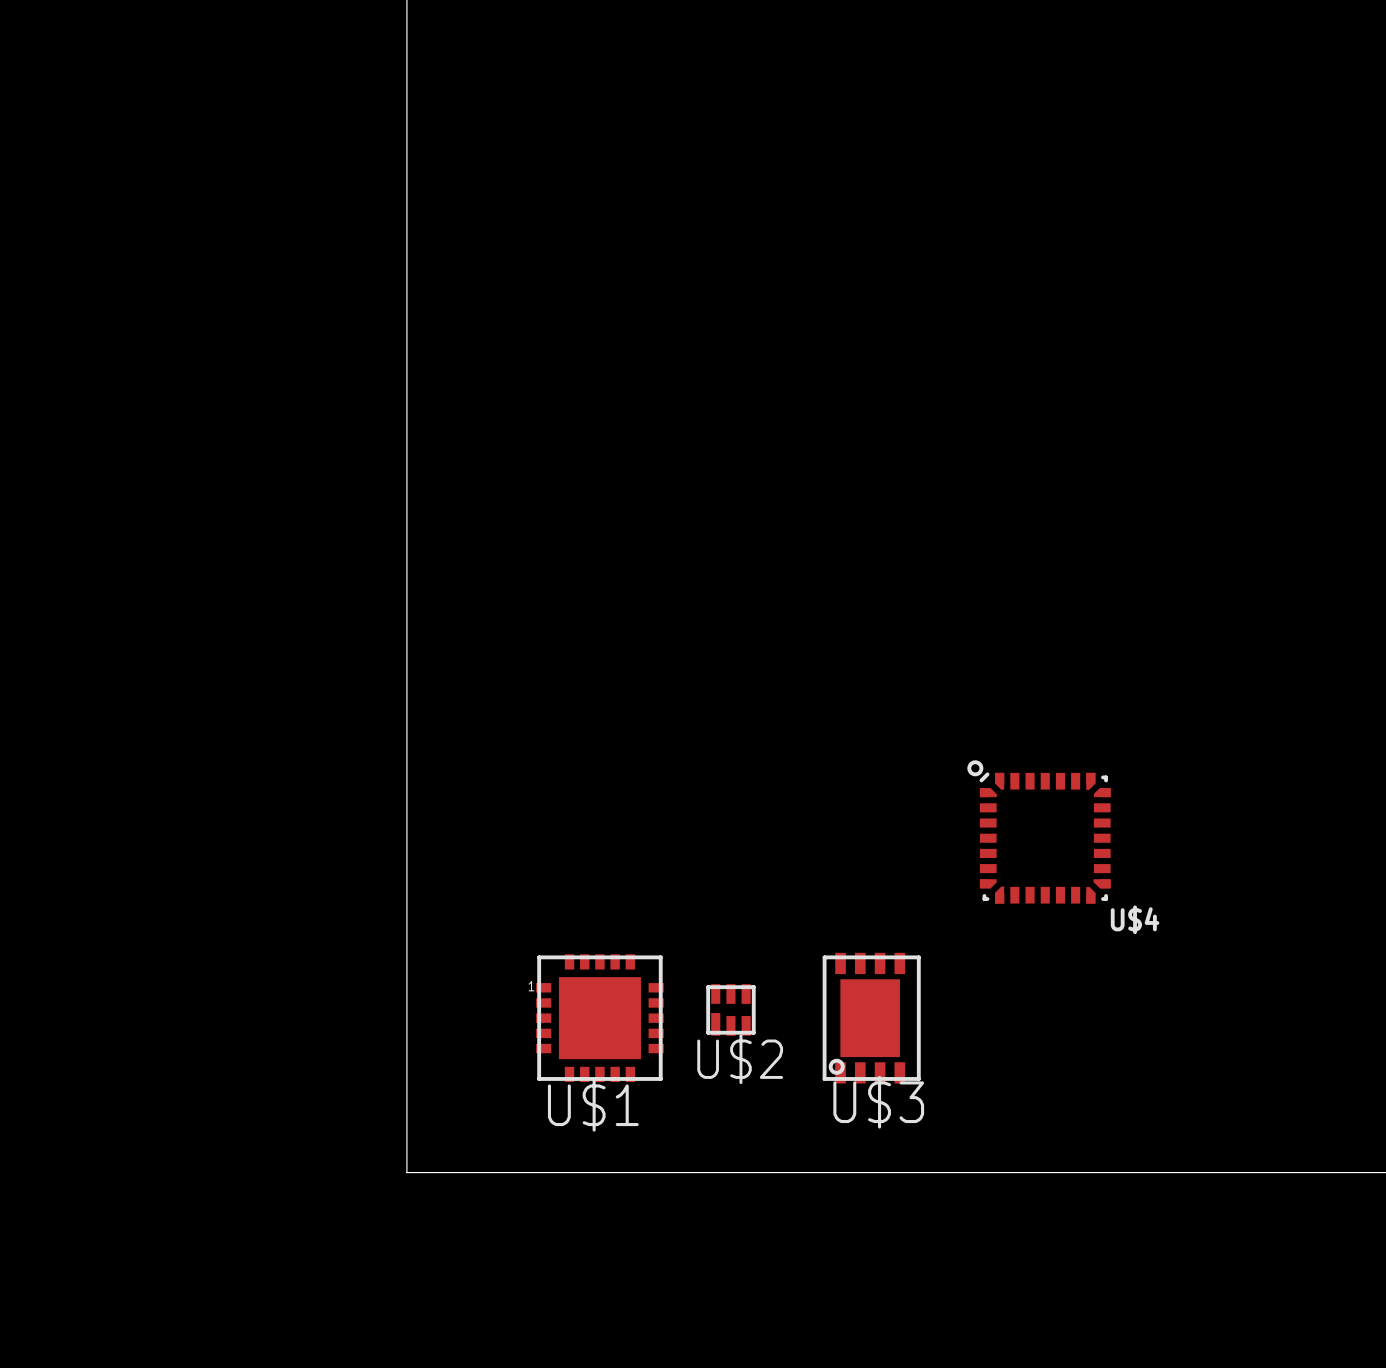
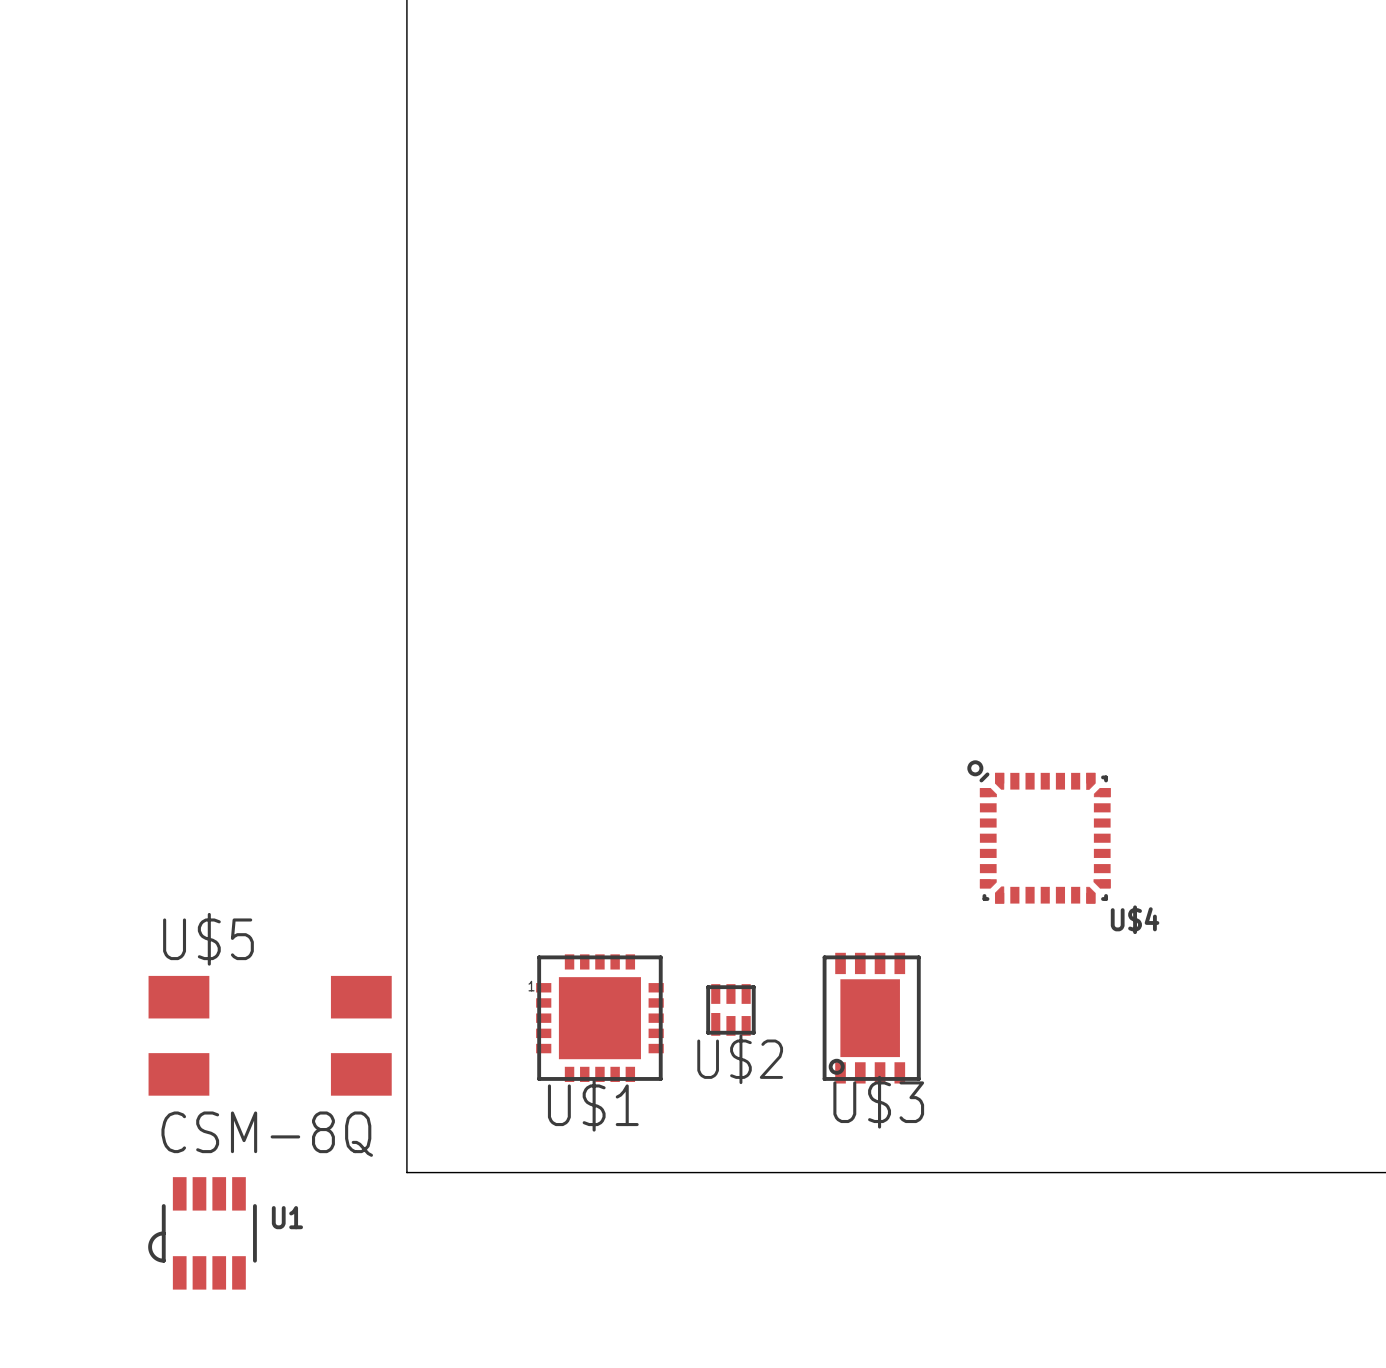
U$5: none -> CSM-8Q (270, 1035)
U1: none -> (202, 1233)

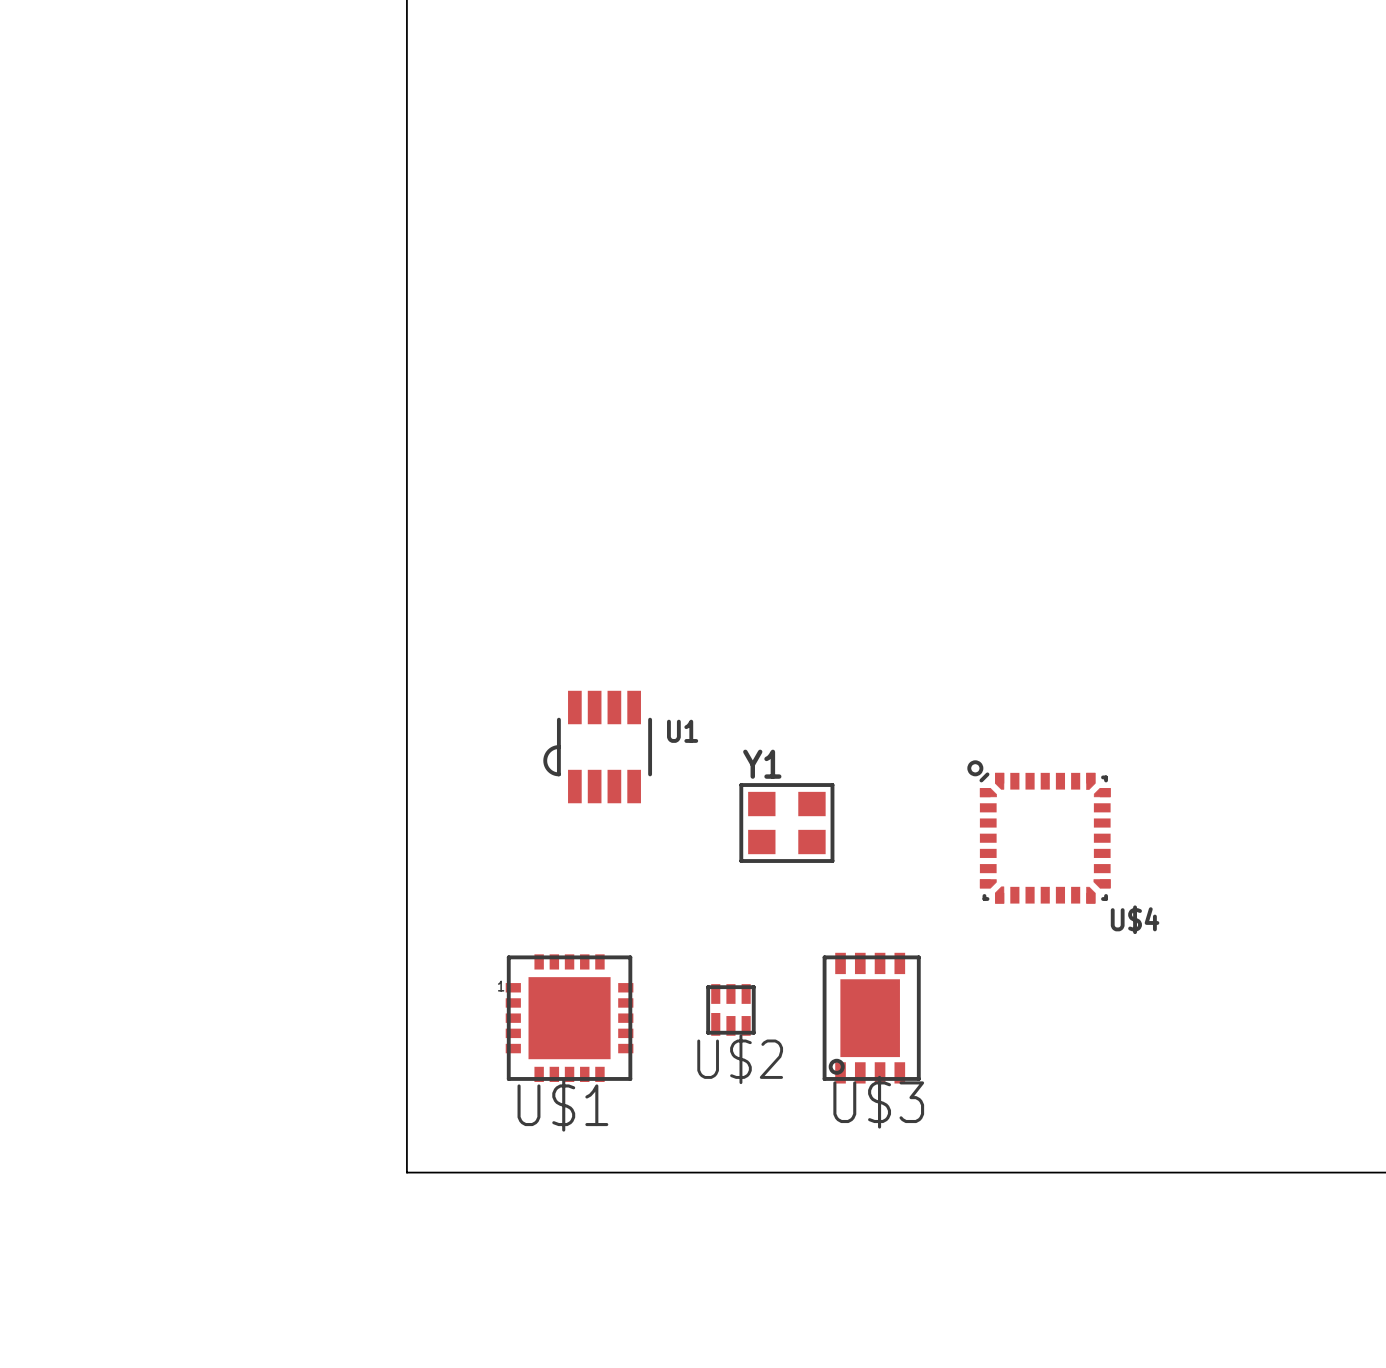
Y1: none -> (786, 823)
U$1 position: (599, 1018) -> (569, 1018)
U$5: CSM-8Q (270, 1035) -> none
U1 position: (202, 1233) -> (597, 747)

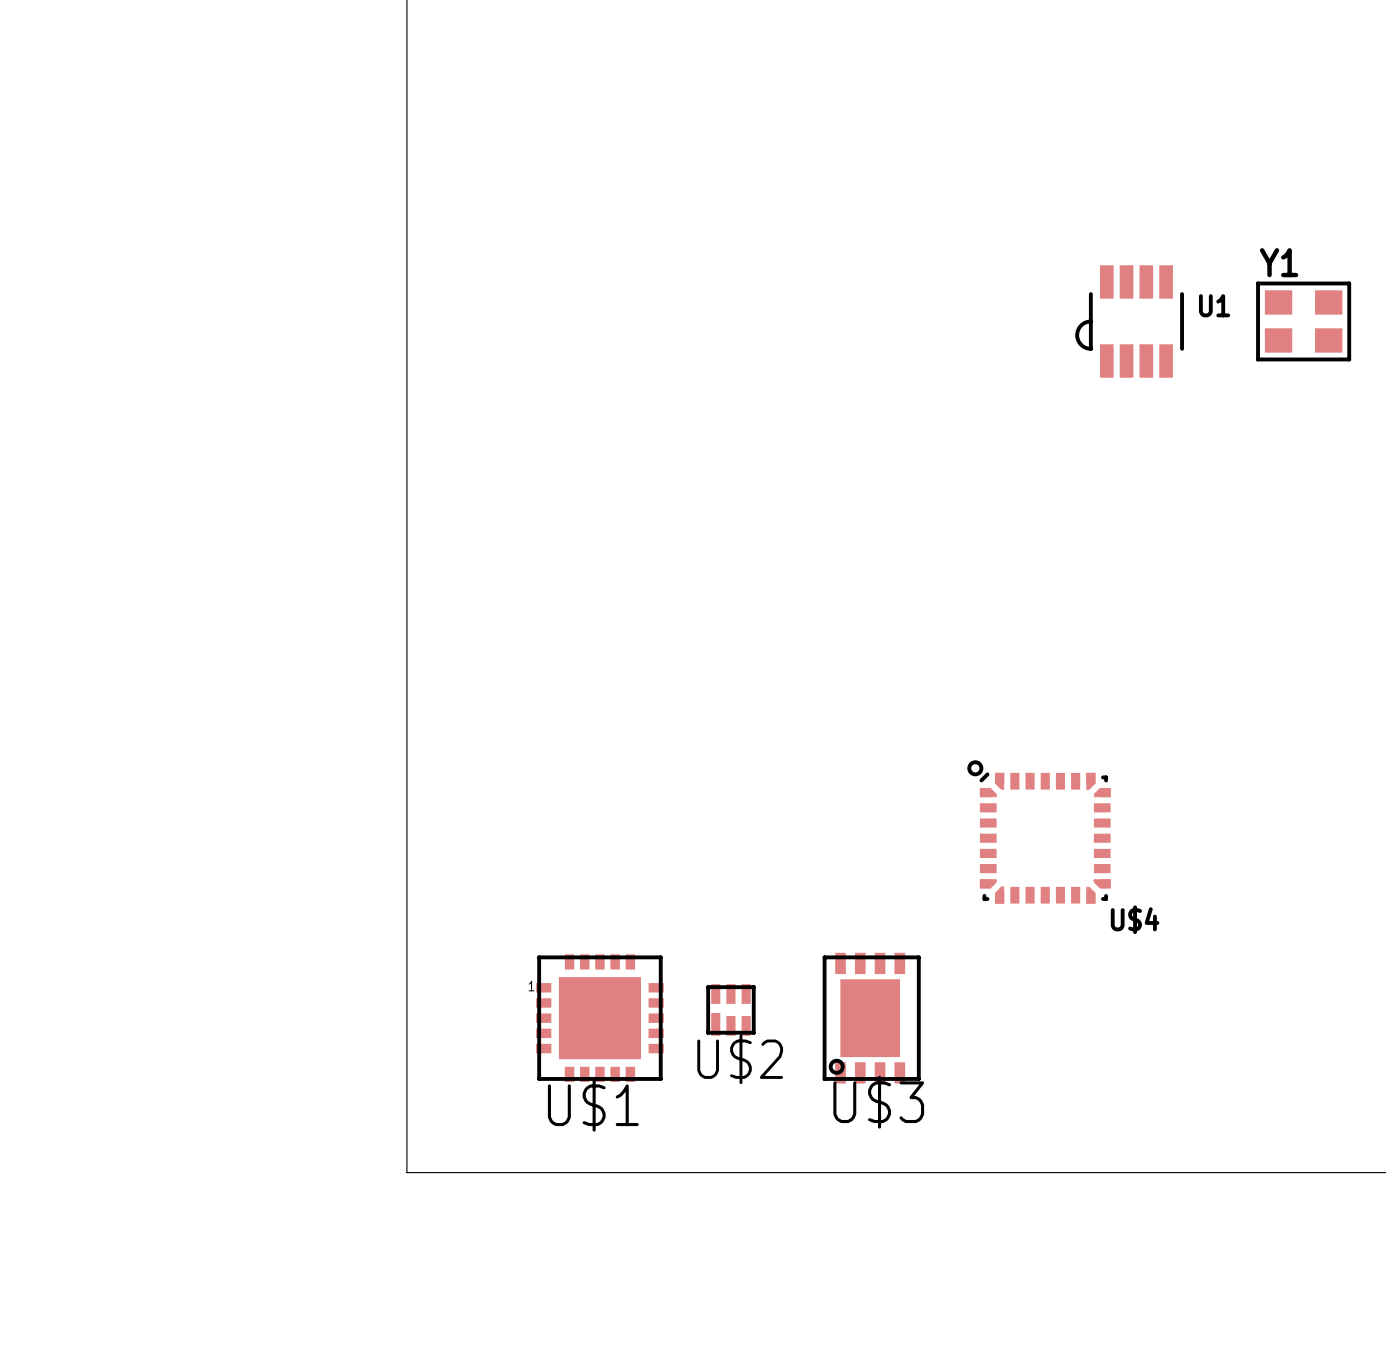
U1 position: (597, 747) -> (1129, 321)
Y1 position: (786, 823) -> (1303, 321)
U$1 position: (569, 1018) -> (599, 1018)

